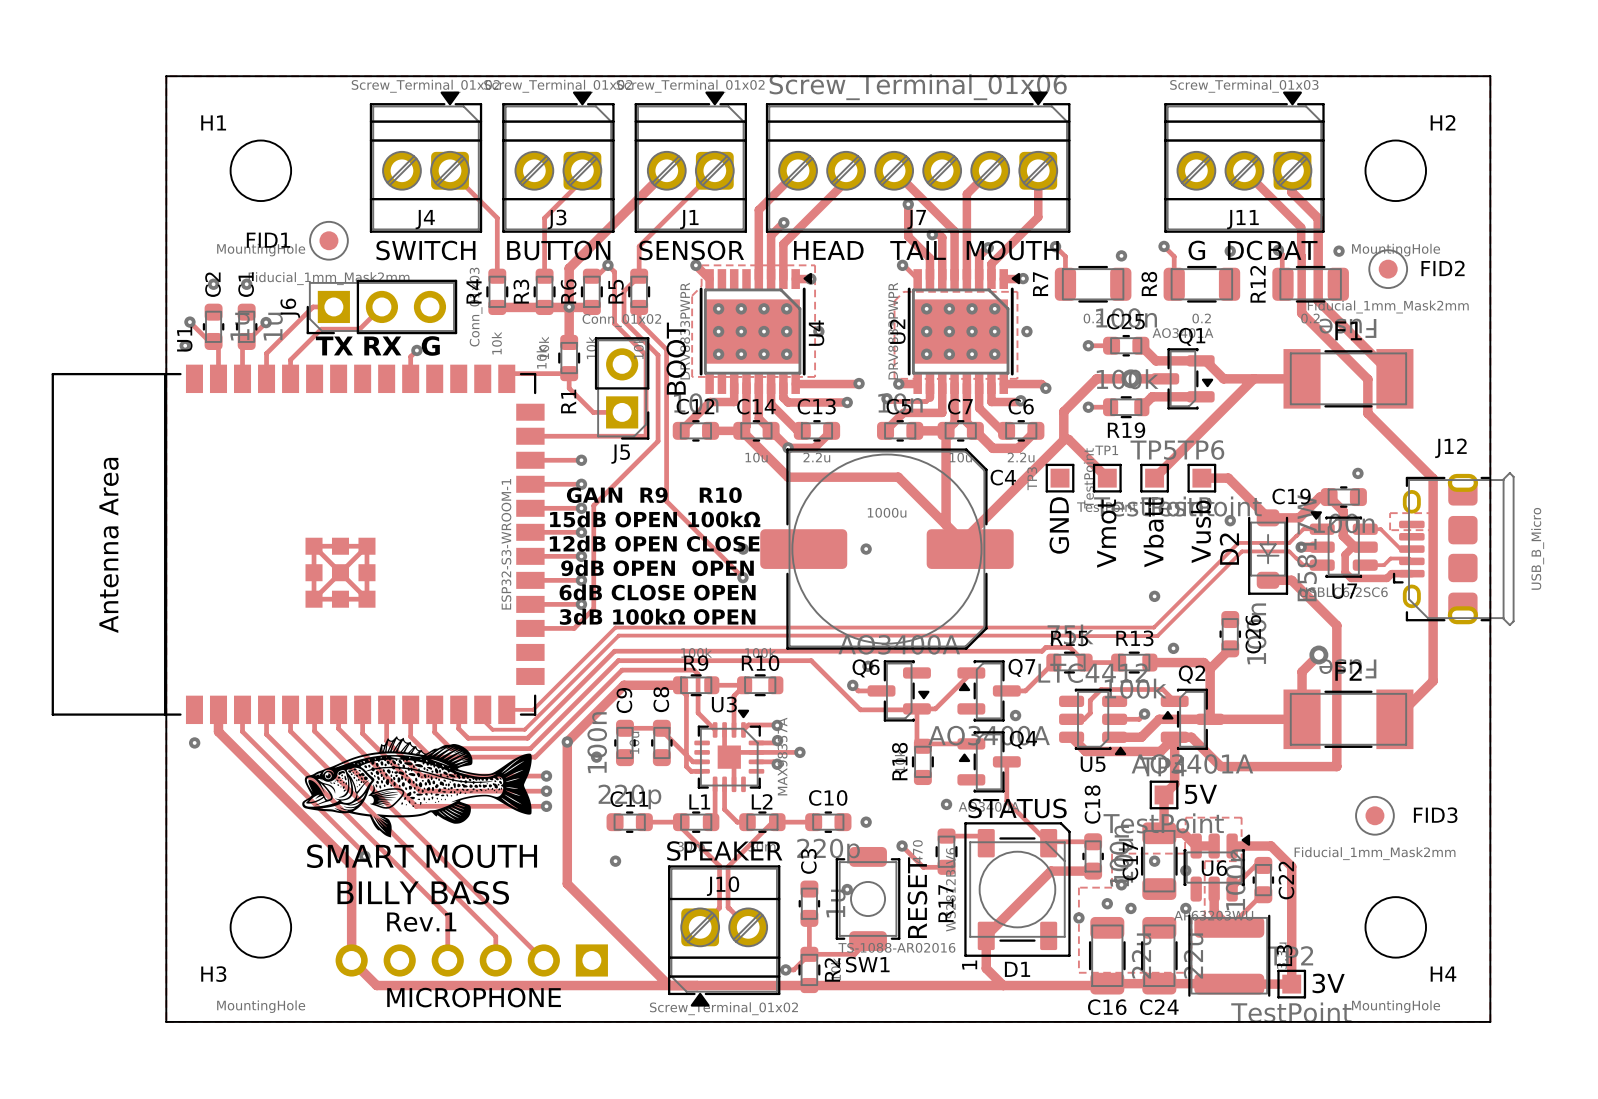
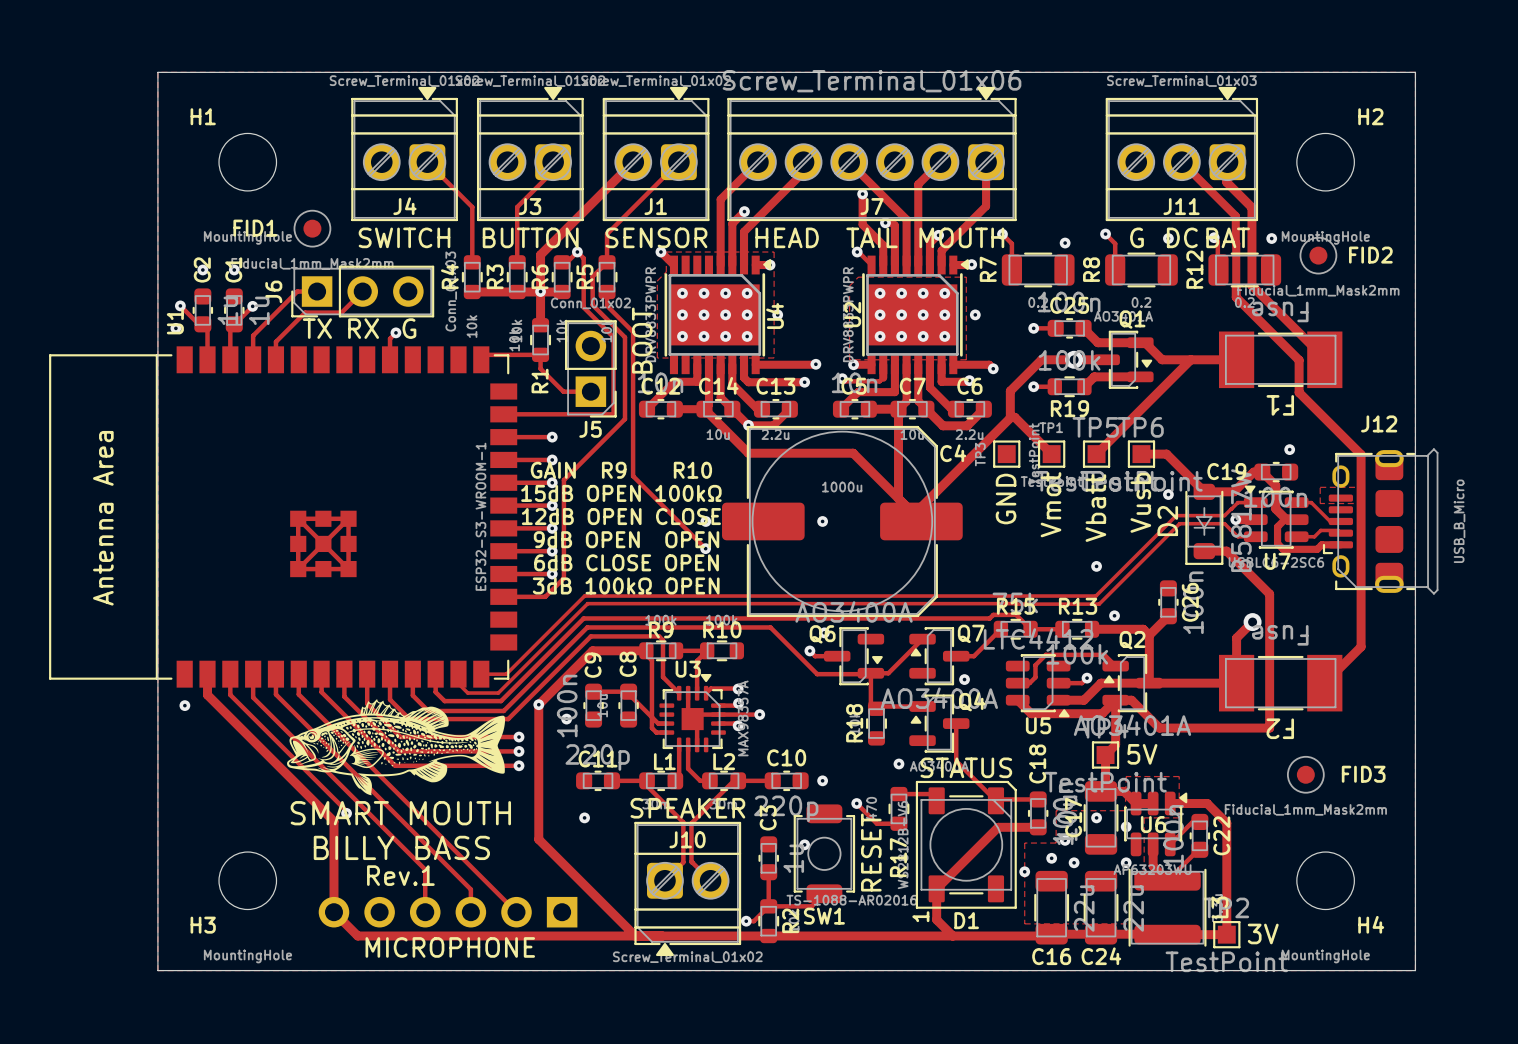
F1 name rotation: 0° (1348, 330) -> 180° (1280, 405)
F1 name position: F1 (1348, 330) -> F1 (1280, 405)
F2 name rotation: 0° (1348, 671) -> 180° (1280, 728)
F2 name position: F2 (1348, 671) -> F2 (1280, 728)

